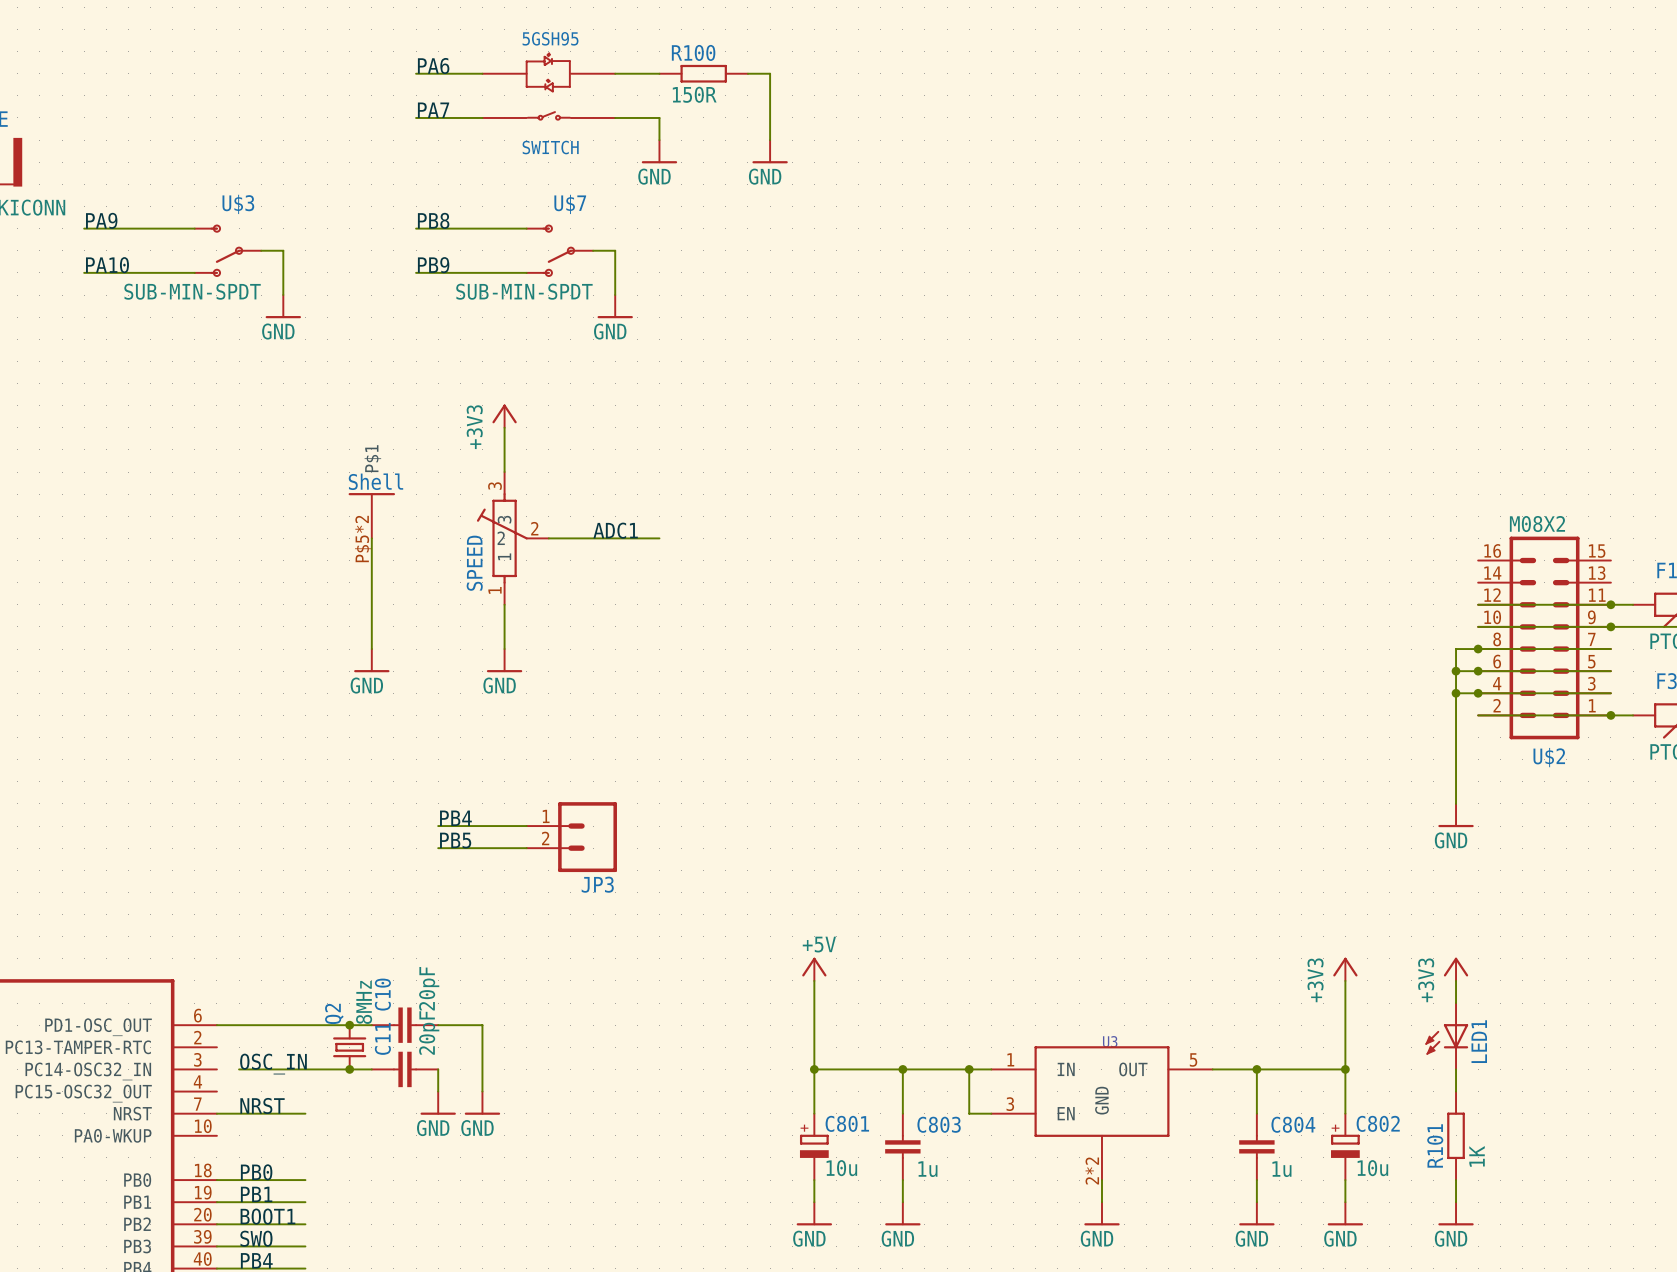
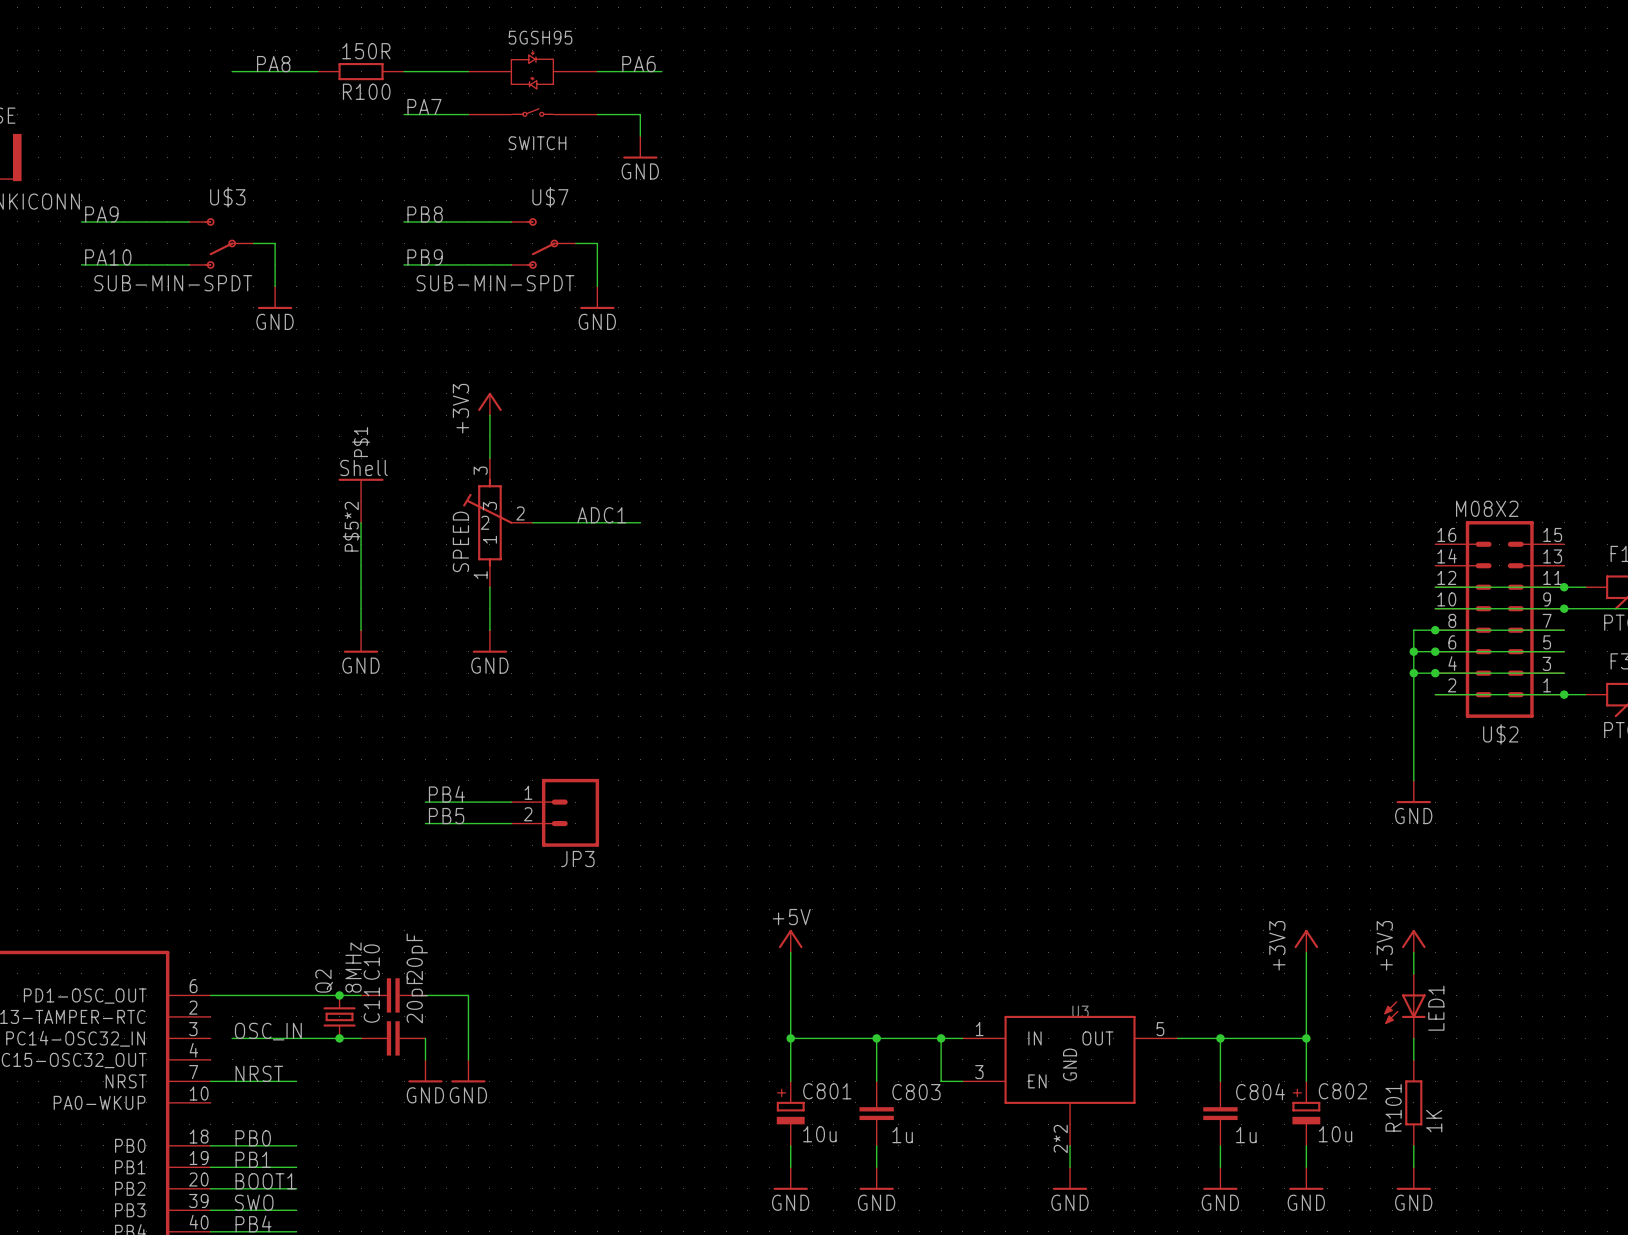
R100 name position: R100 (693, 52) -> R100 (366, 91)
label: none -> PA8 (273, 64)
label: PA6 (433, 66) -> none
label: none -> PA6 (638, 64)
wire: none -> (232, 71) (318, 71)
R100 position: (703, 73) -> (361, 71)
wire: (747, 73) (770, 73) (770, 140) -> none
R100 value position: 150R (694, 94) -> 150R (366, 51)
power symbol: GND (770, 151) -> none

